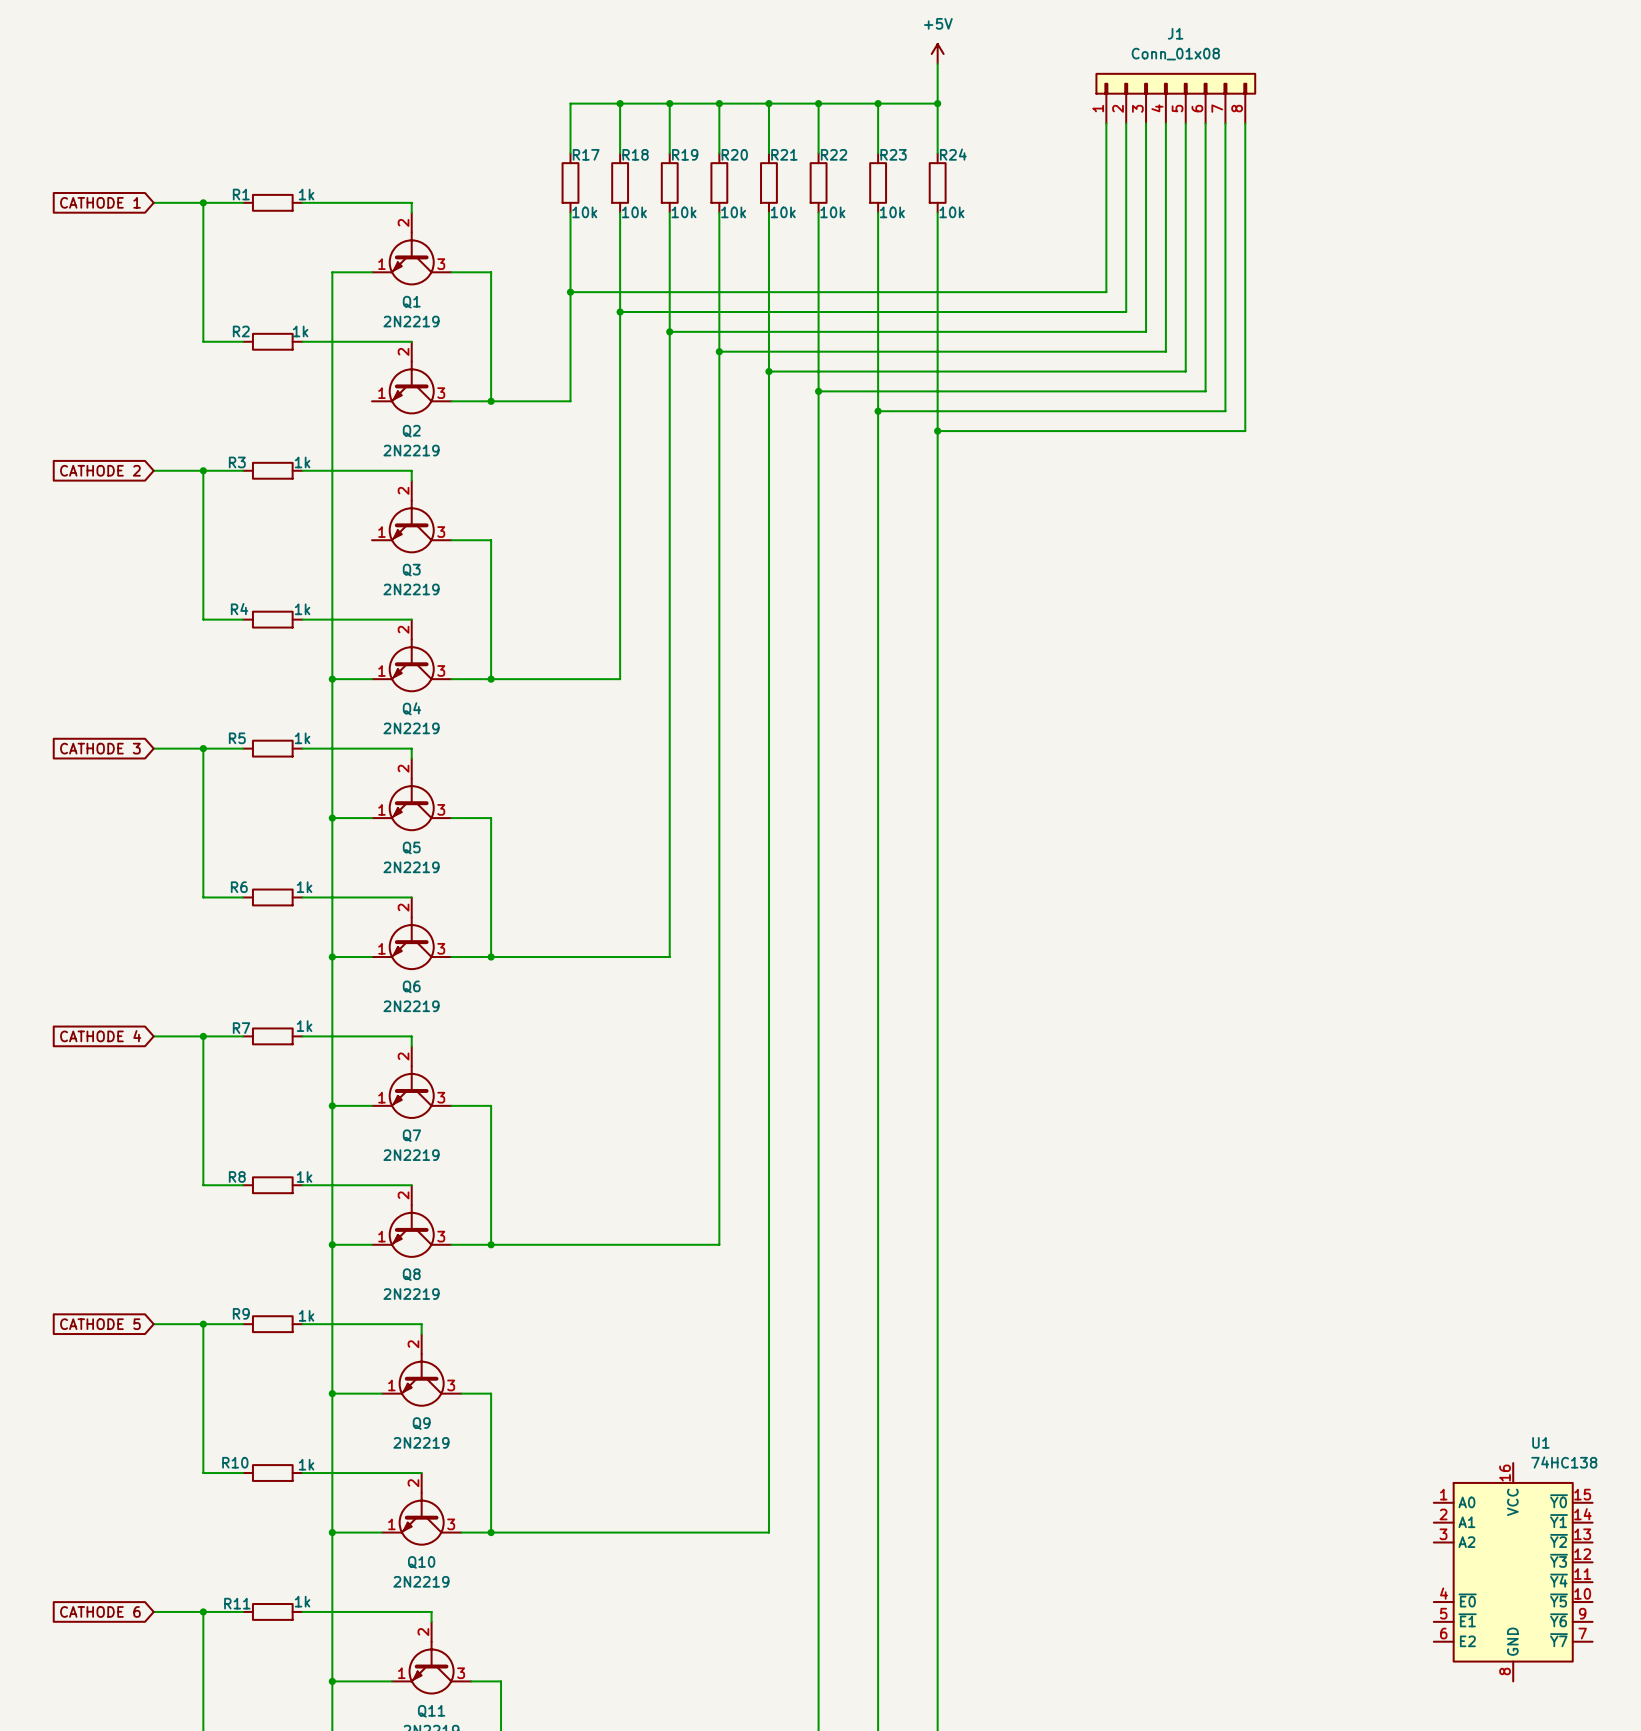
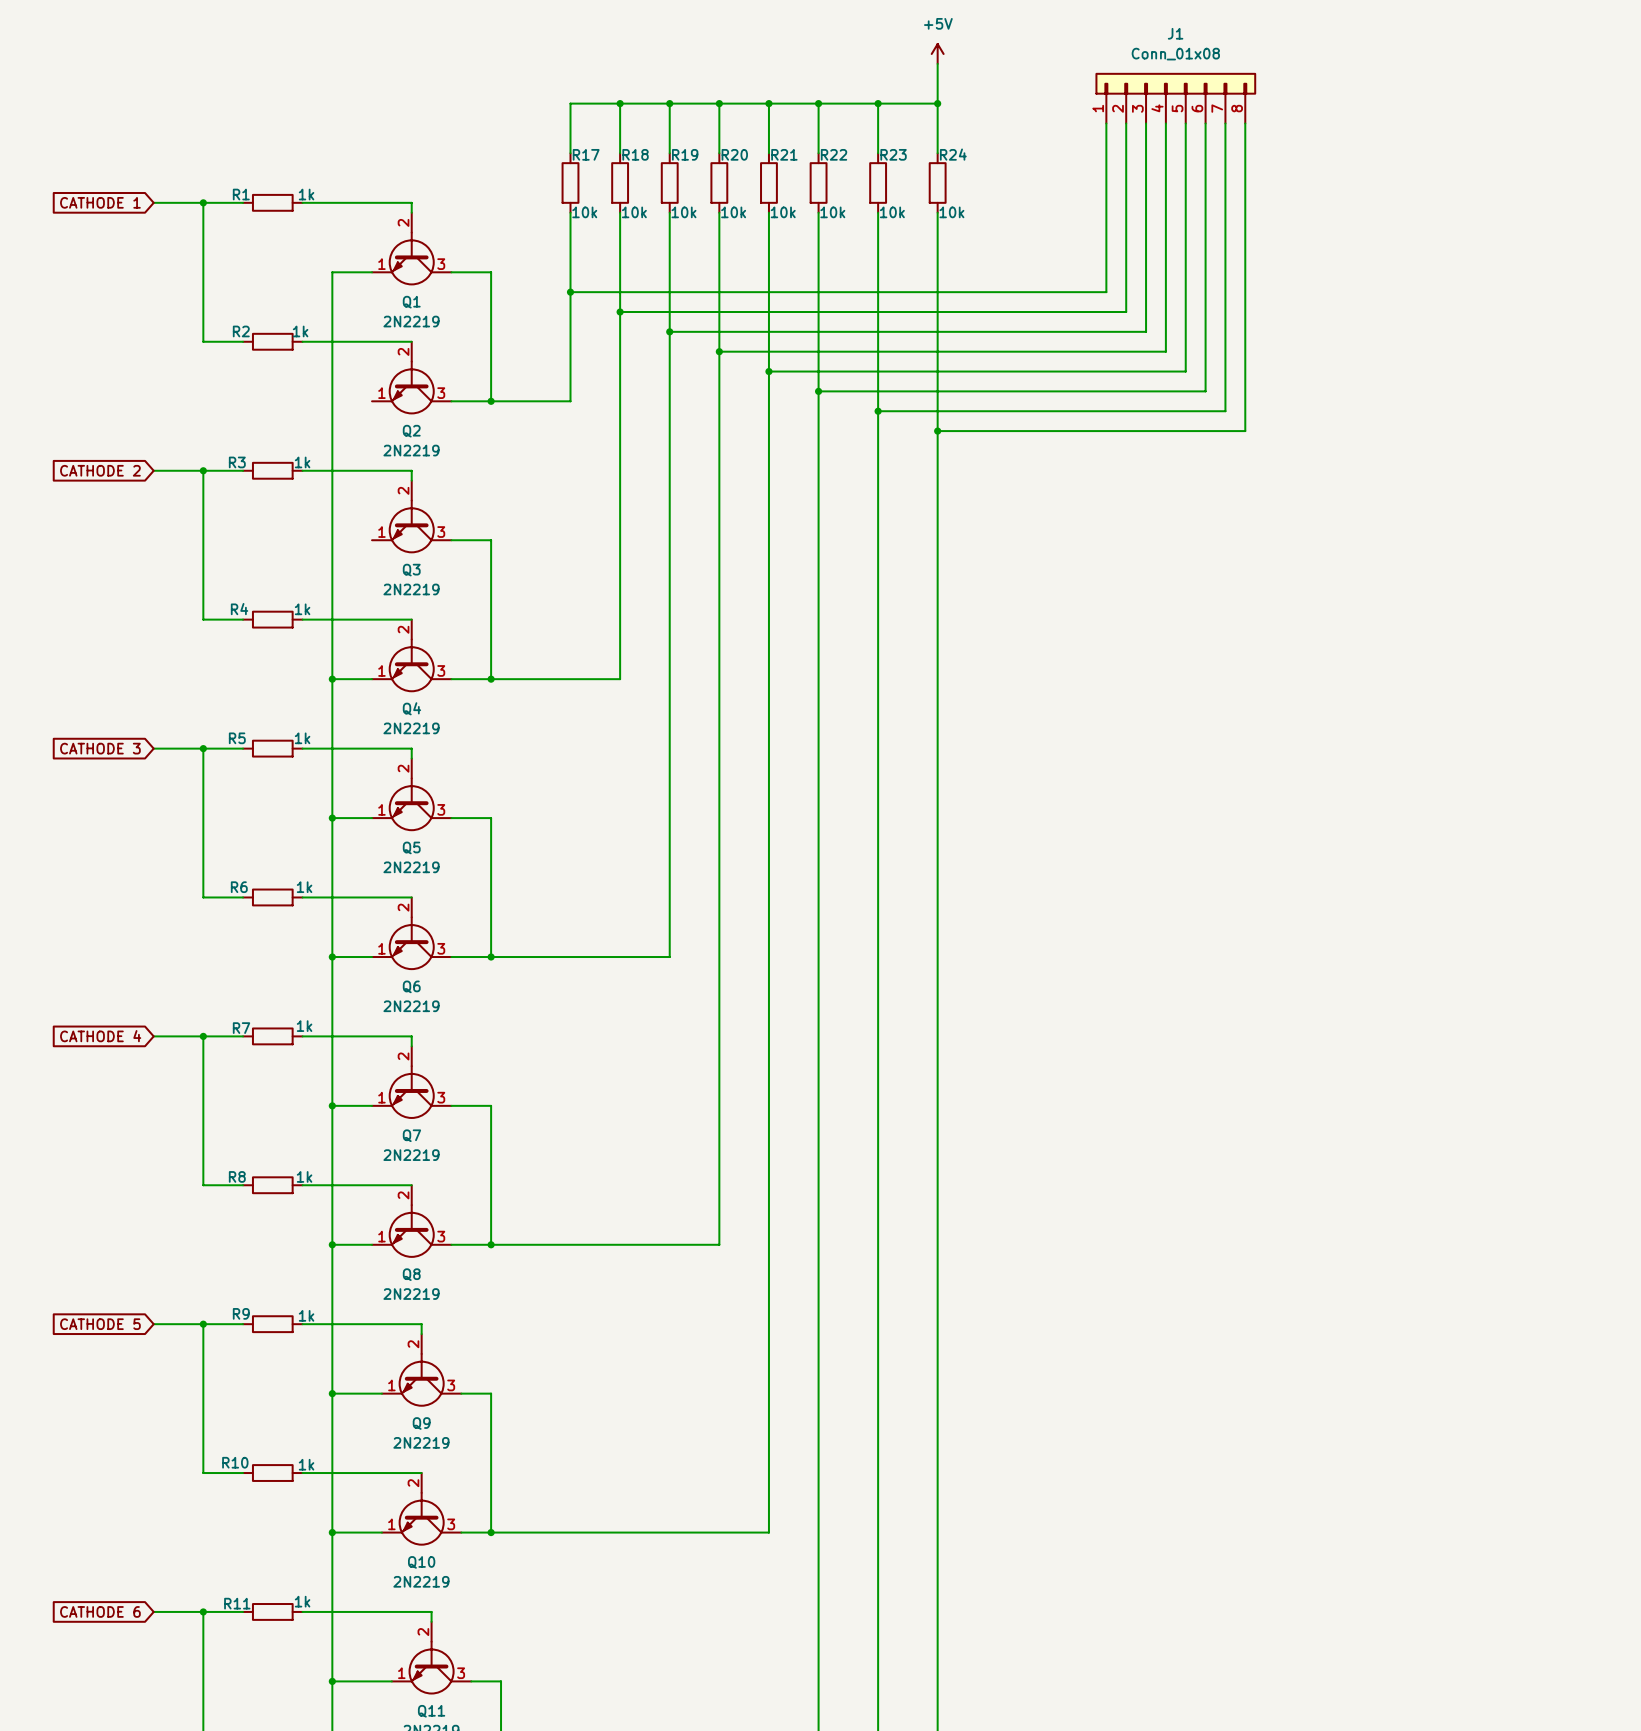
U1: 74HC138 (1513, 1572) -> none

